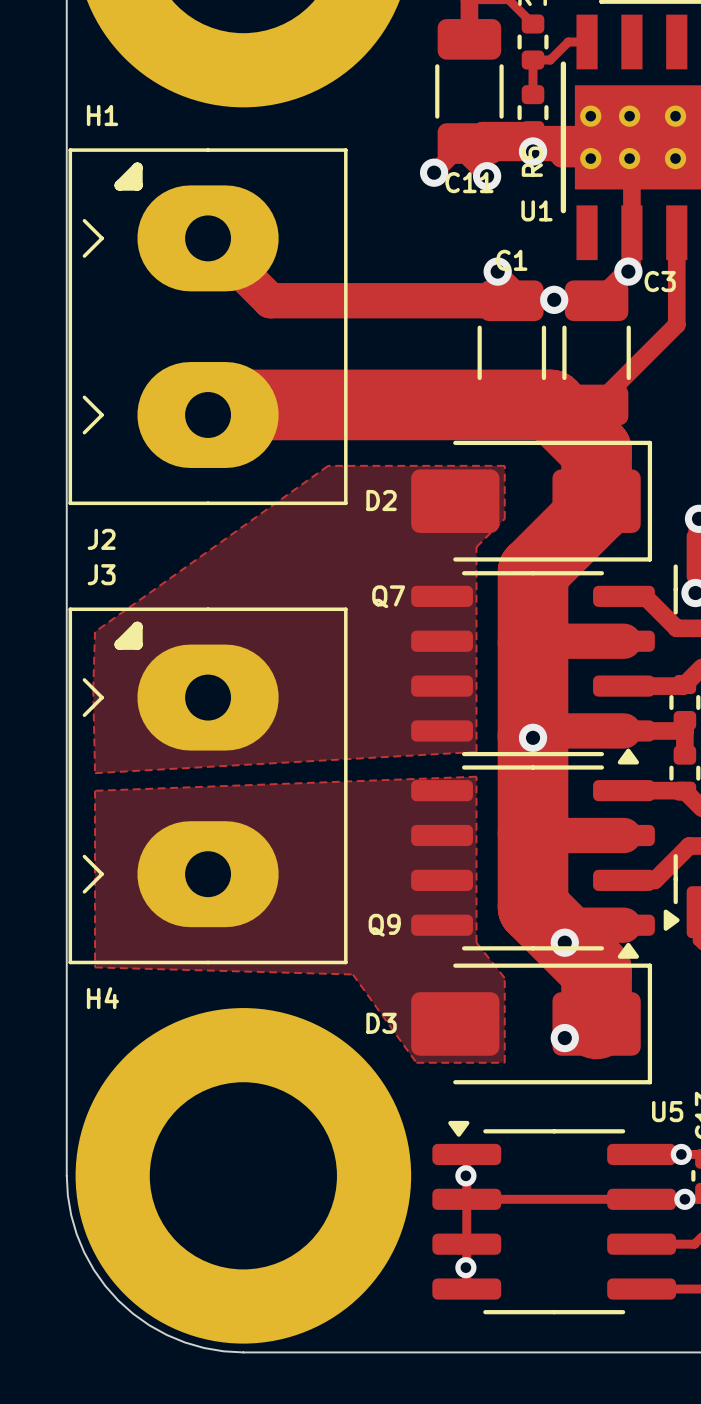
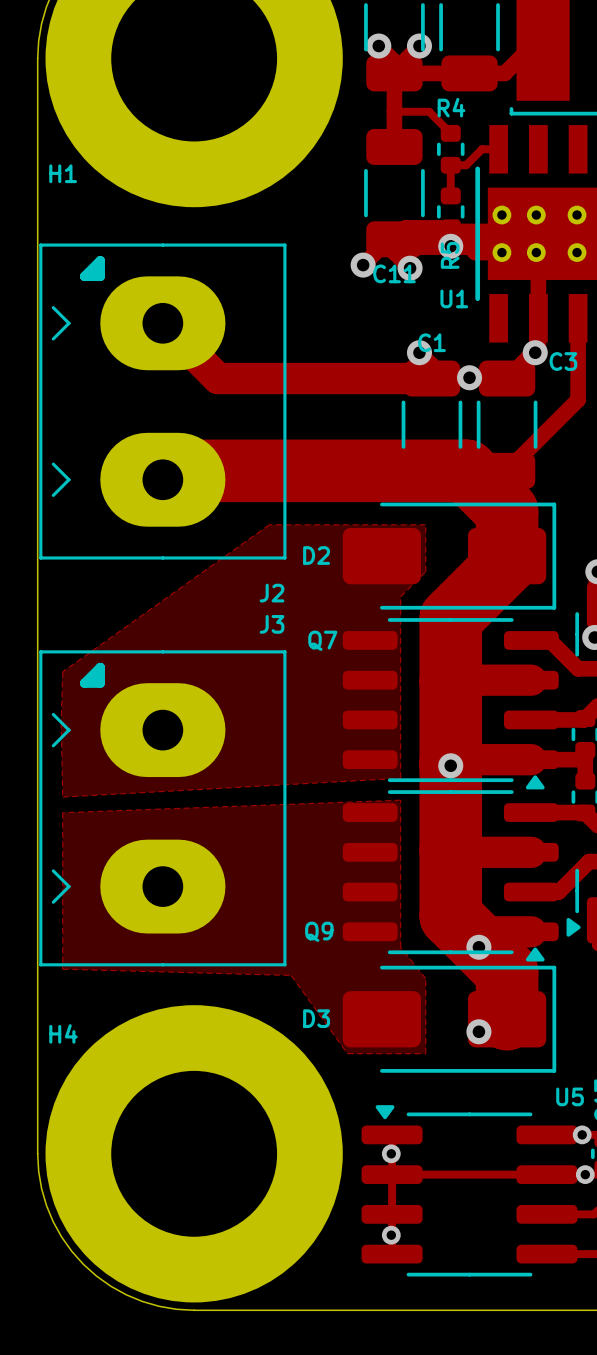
H1 name position: H1 (102, 115) -> H1 (63, 173)
J2 name position: J2 (101, 539) -> J2 (272, 593)
J3 name position: J3 (101, 574) -> J3 (272, 624)
H4 name position: H4 (102, 998) -> H4 (63, 1033)

